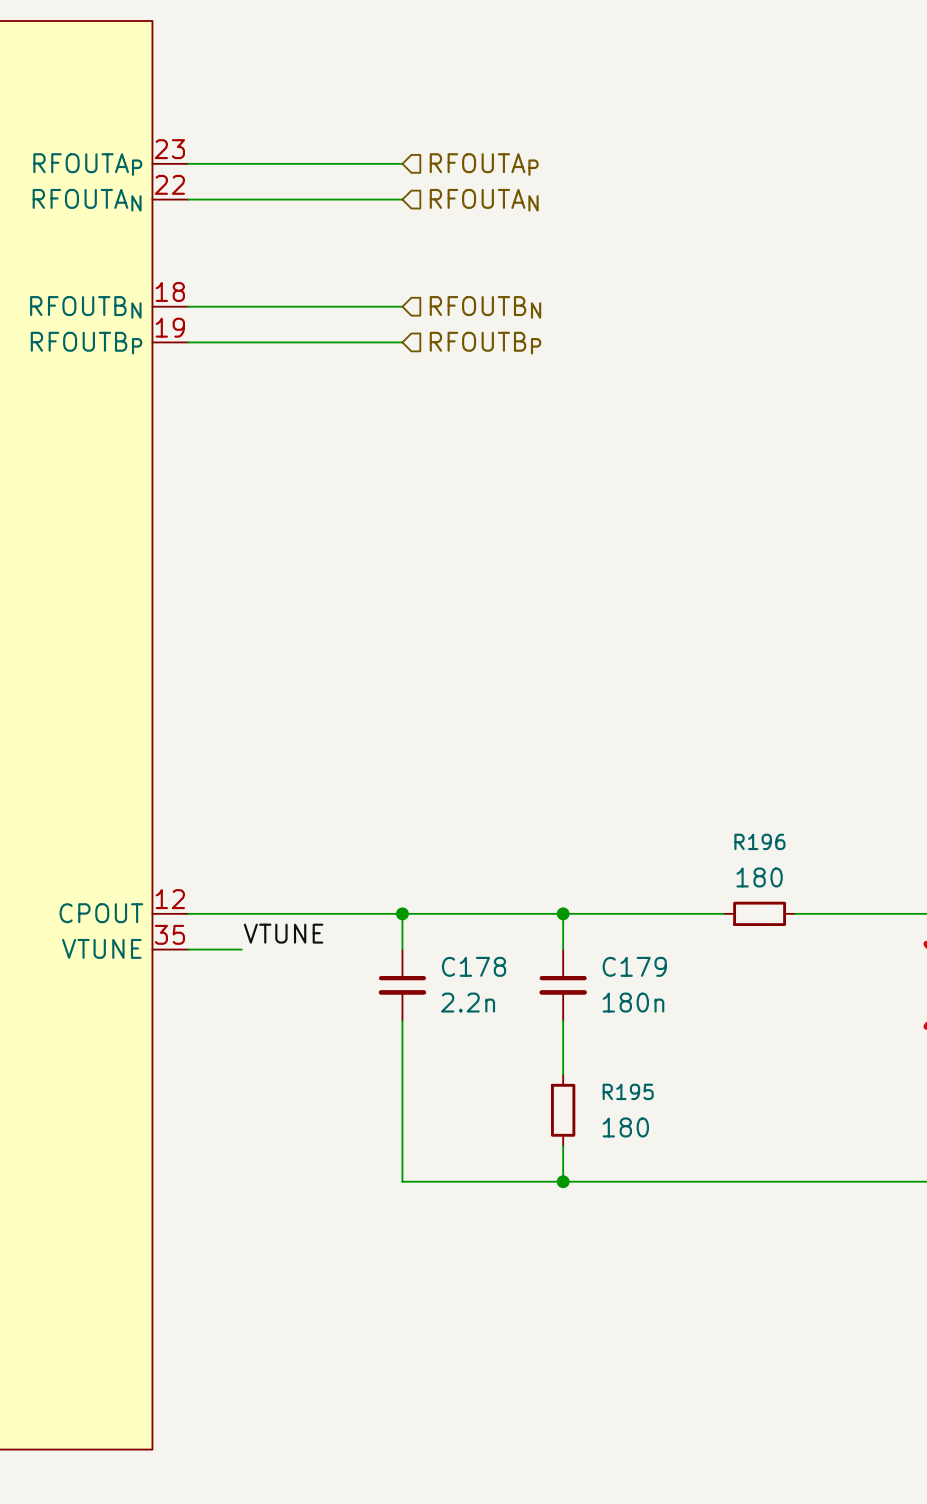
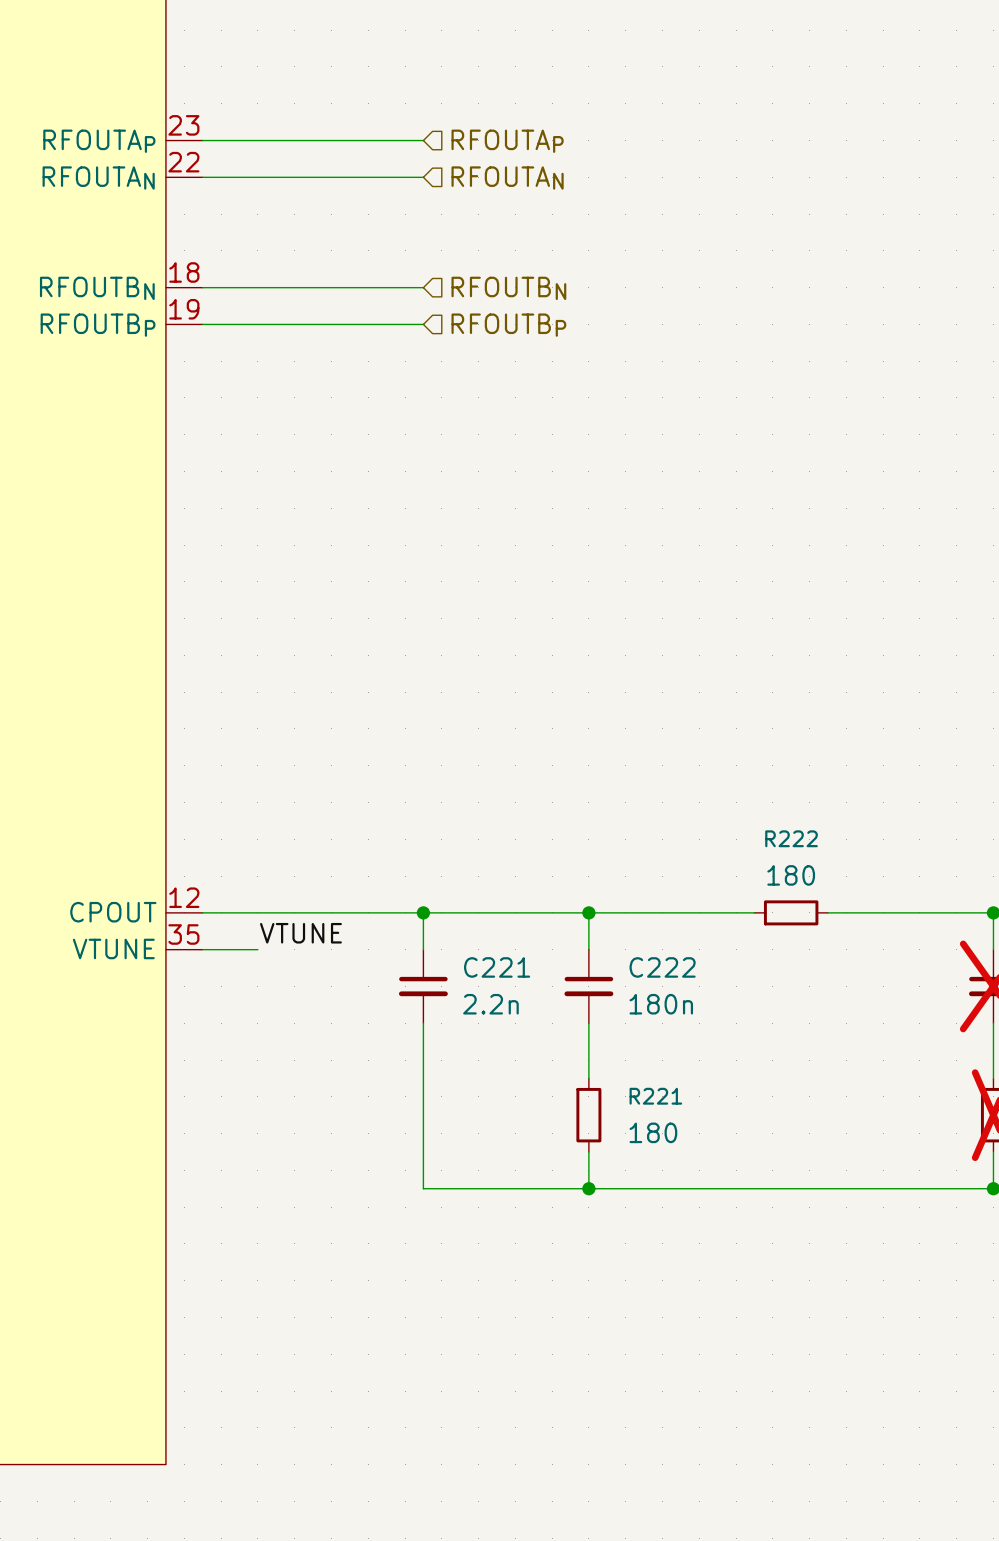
R196 name: R196 (759, 841) -> R222 (791, 838)
C178 name: C178 (474, 966) -> C221 (497, 967)
C179 name: C179 (634, 966) -> C222 (662, 967)
R195 name: R195 (628, 1091) -> R221 (655, 1096)

